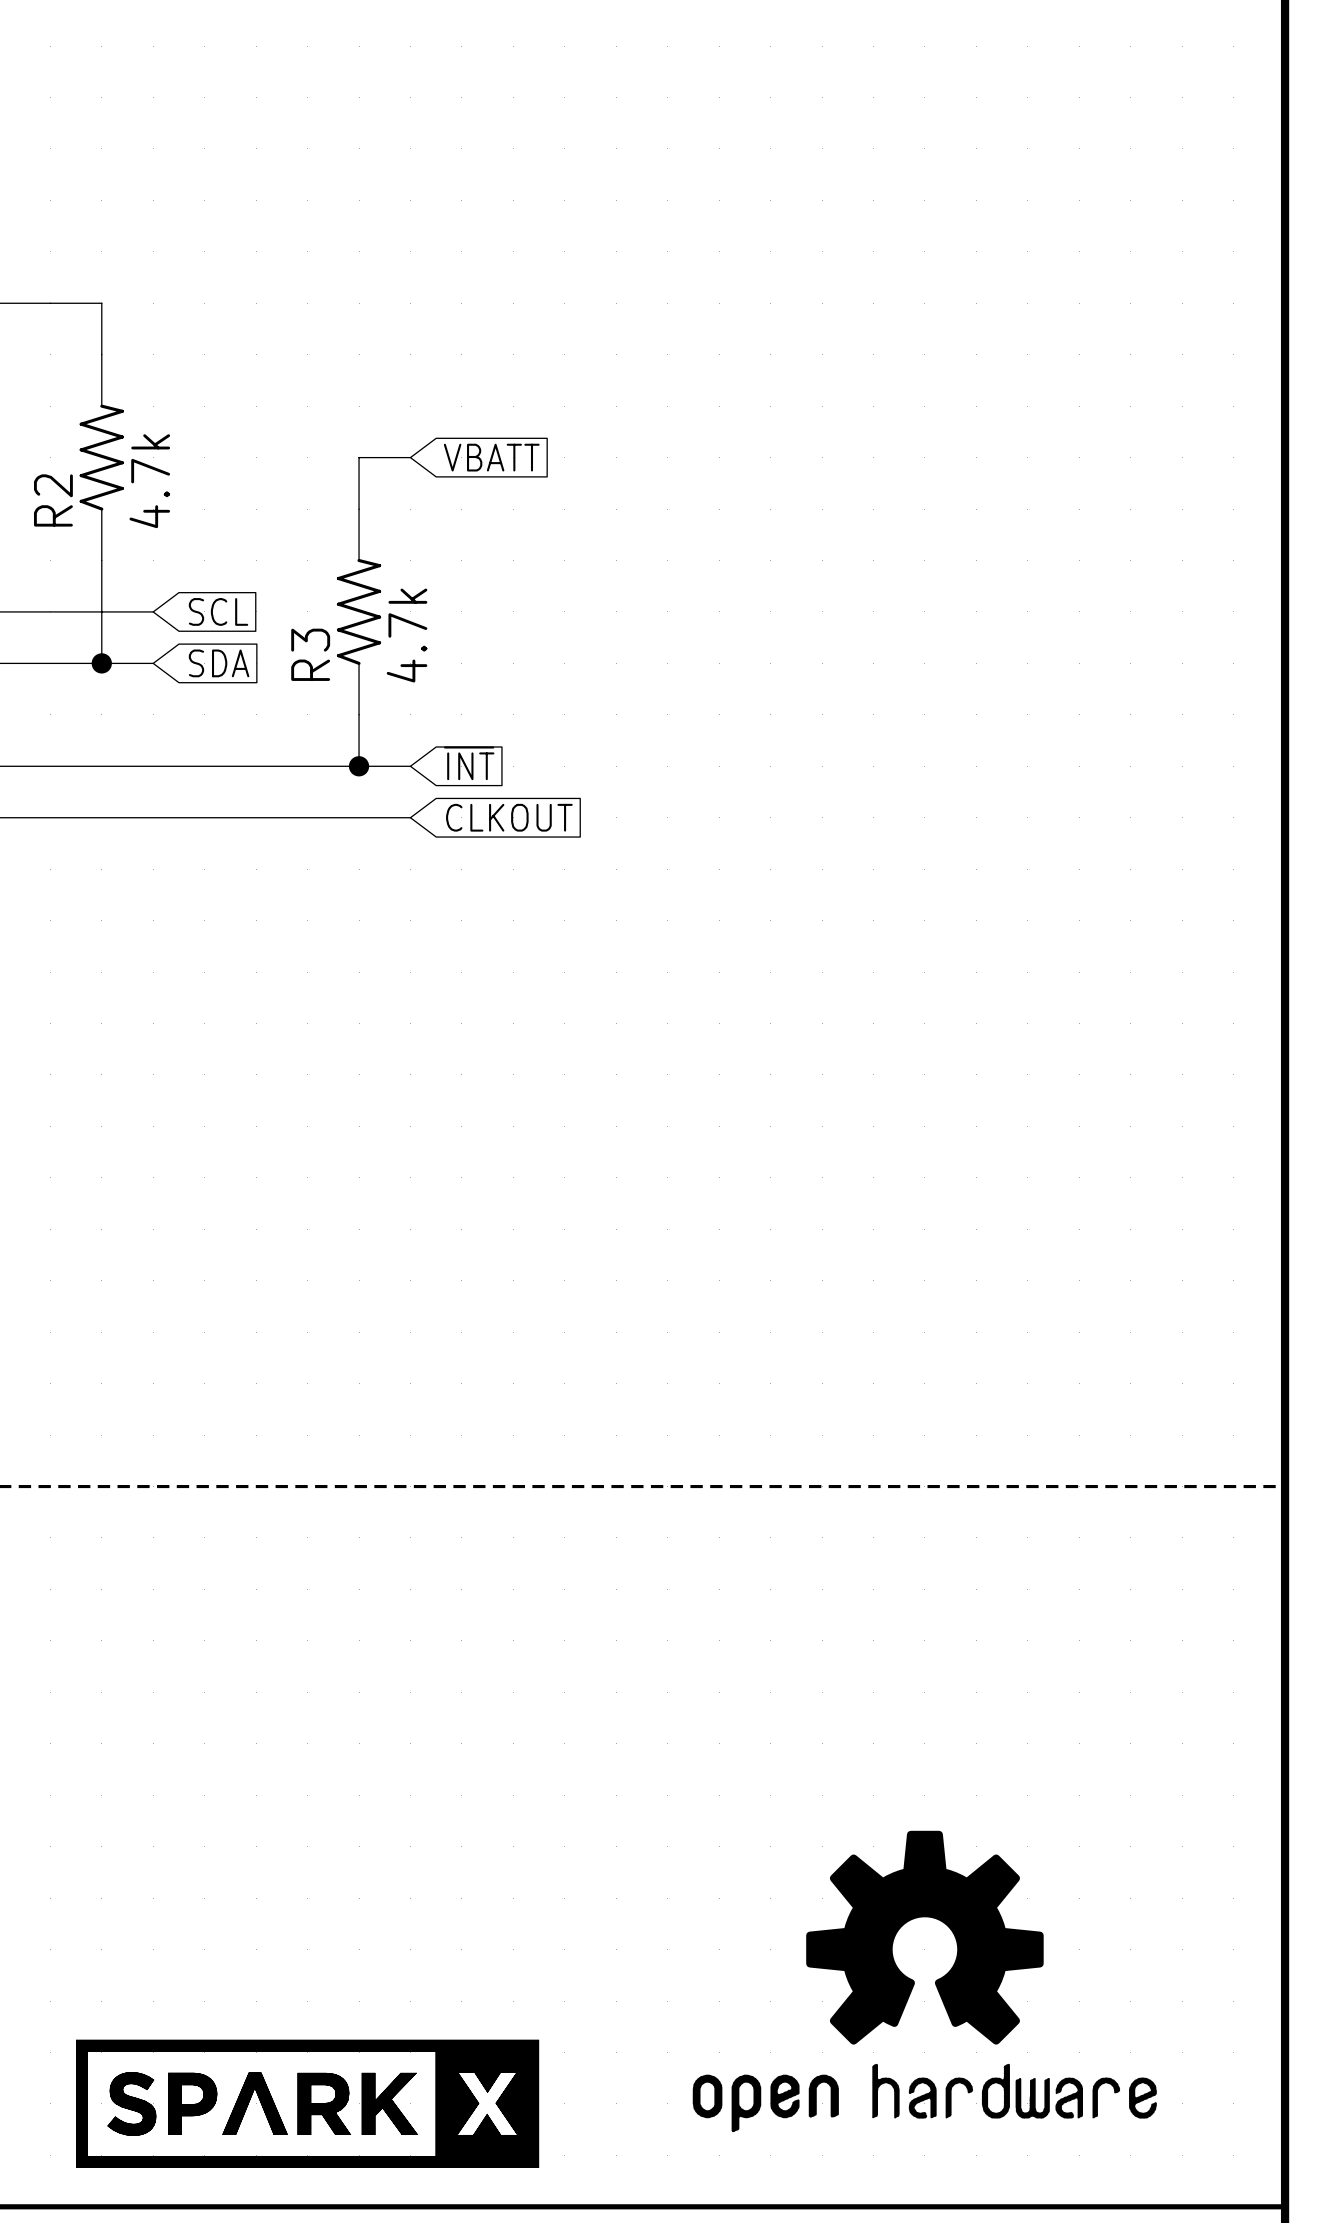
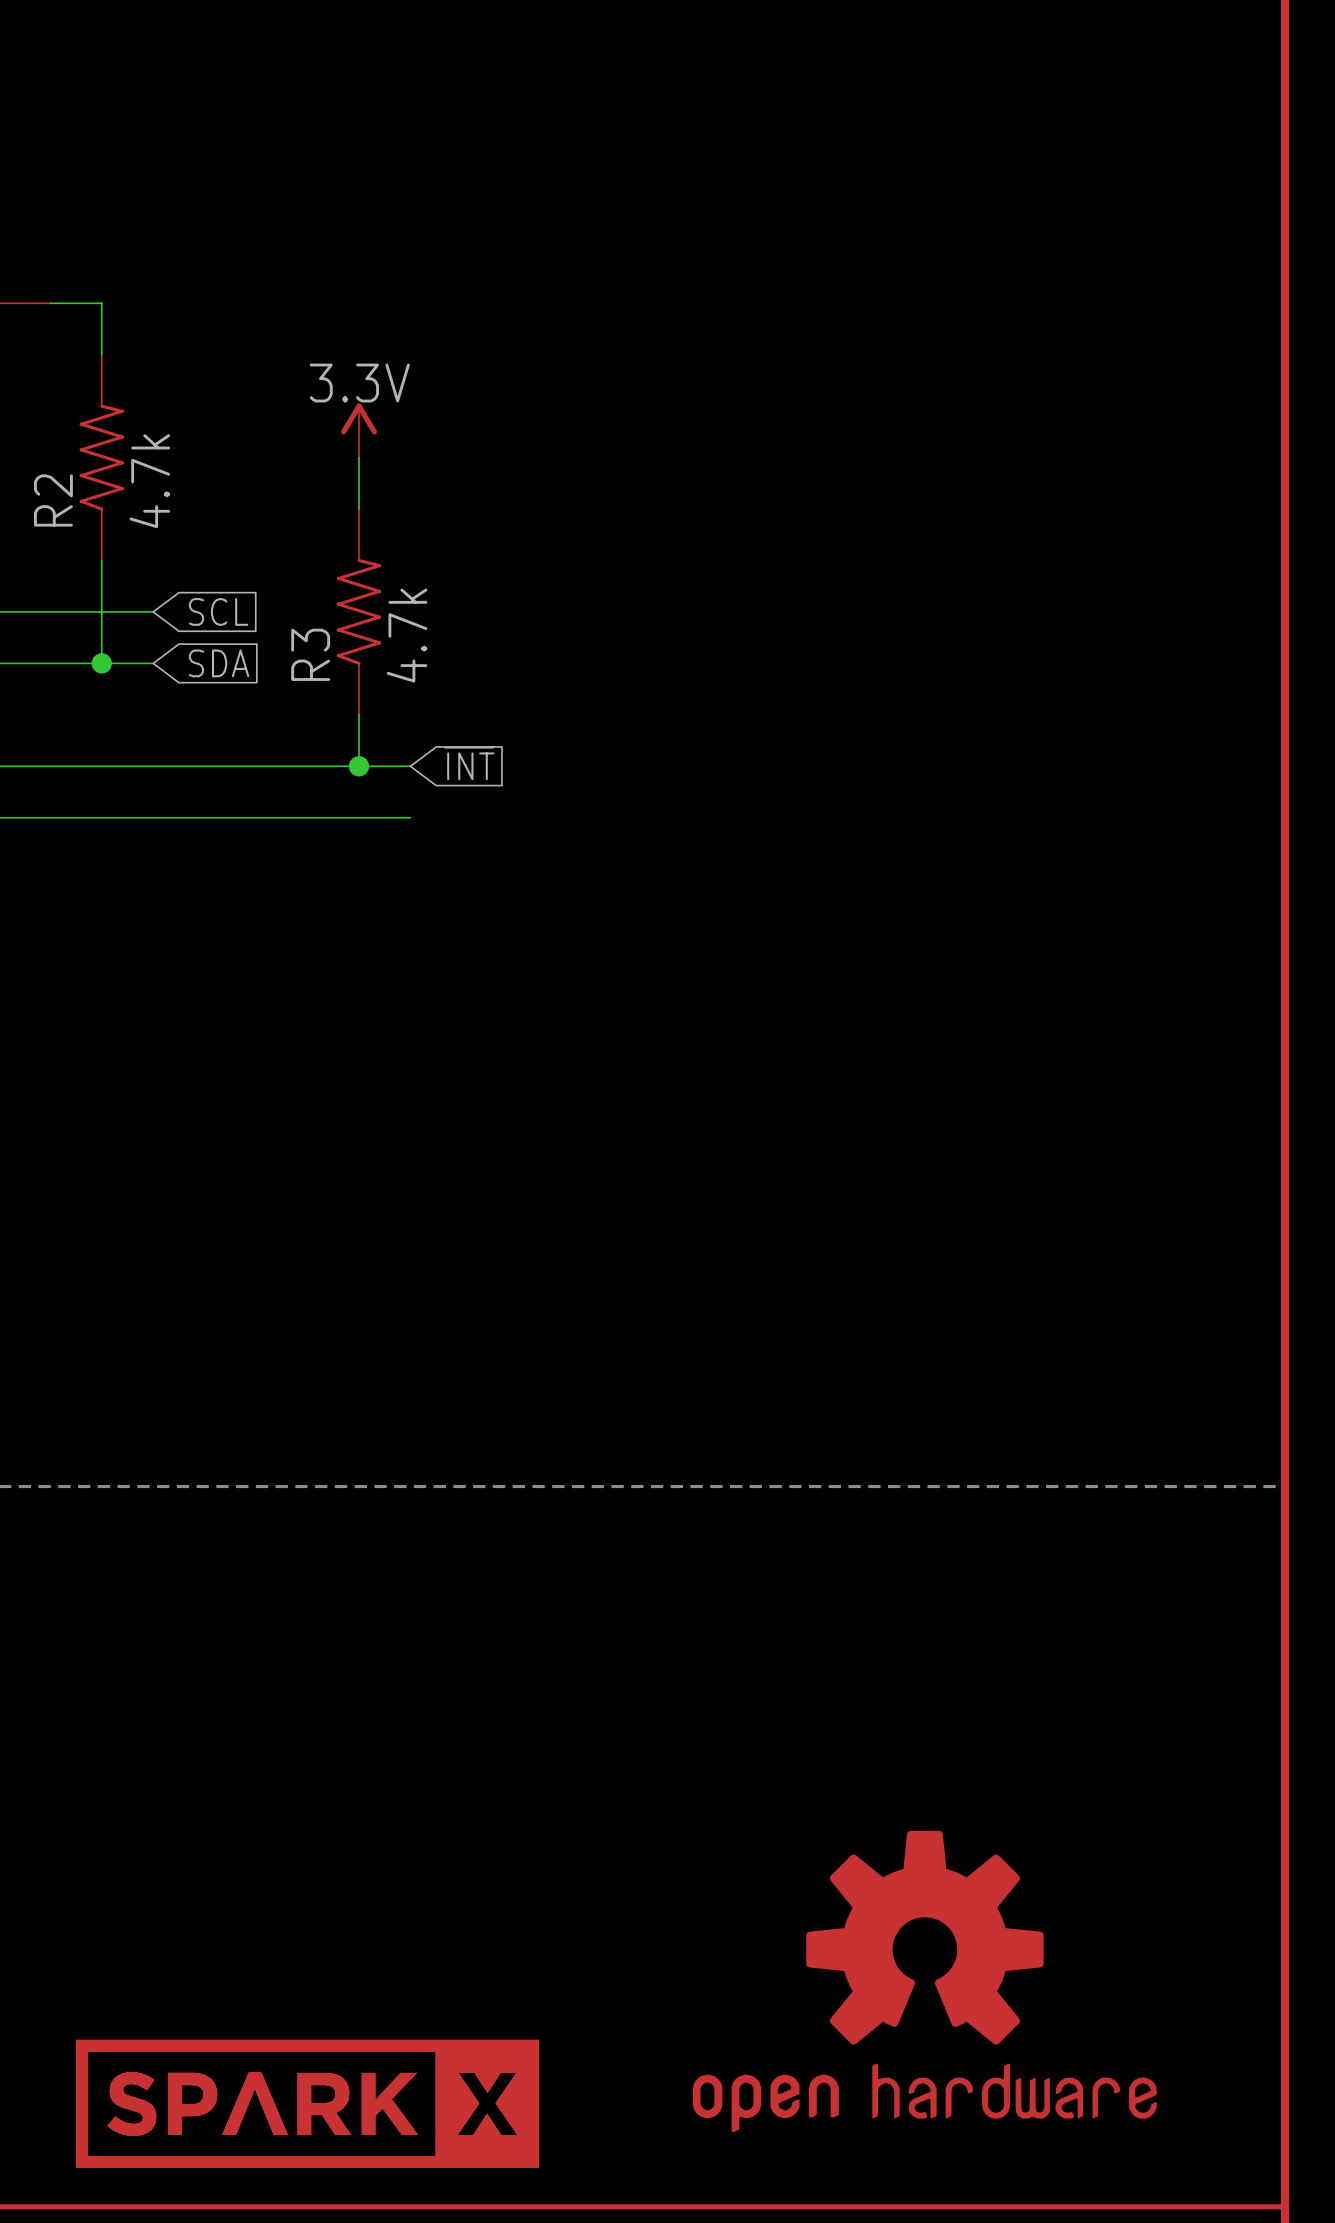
power symbol: none -> 3.3V (359, 430)
wire: (359, 457) (410, 457) -> none
global label: VBATT (491, 457) -> none
global label: CLKOUT (509, 817) -> none

